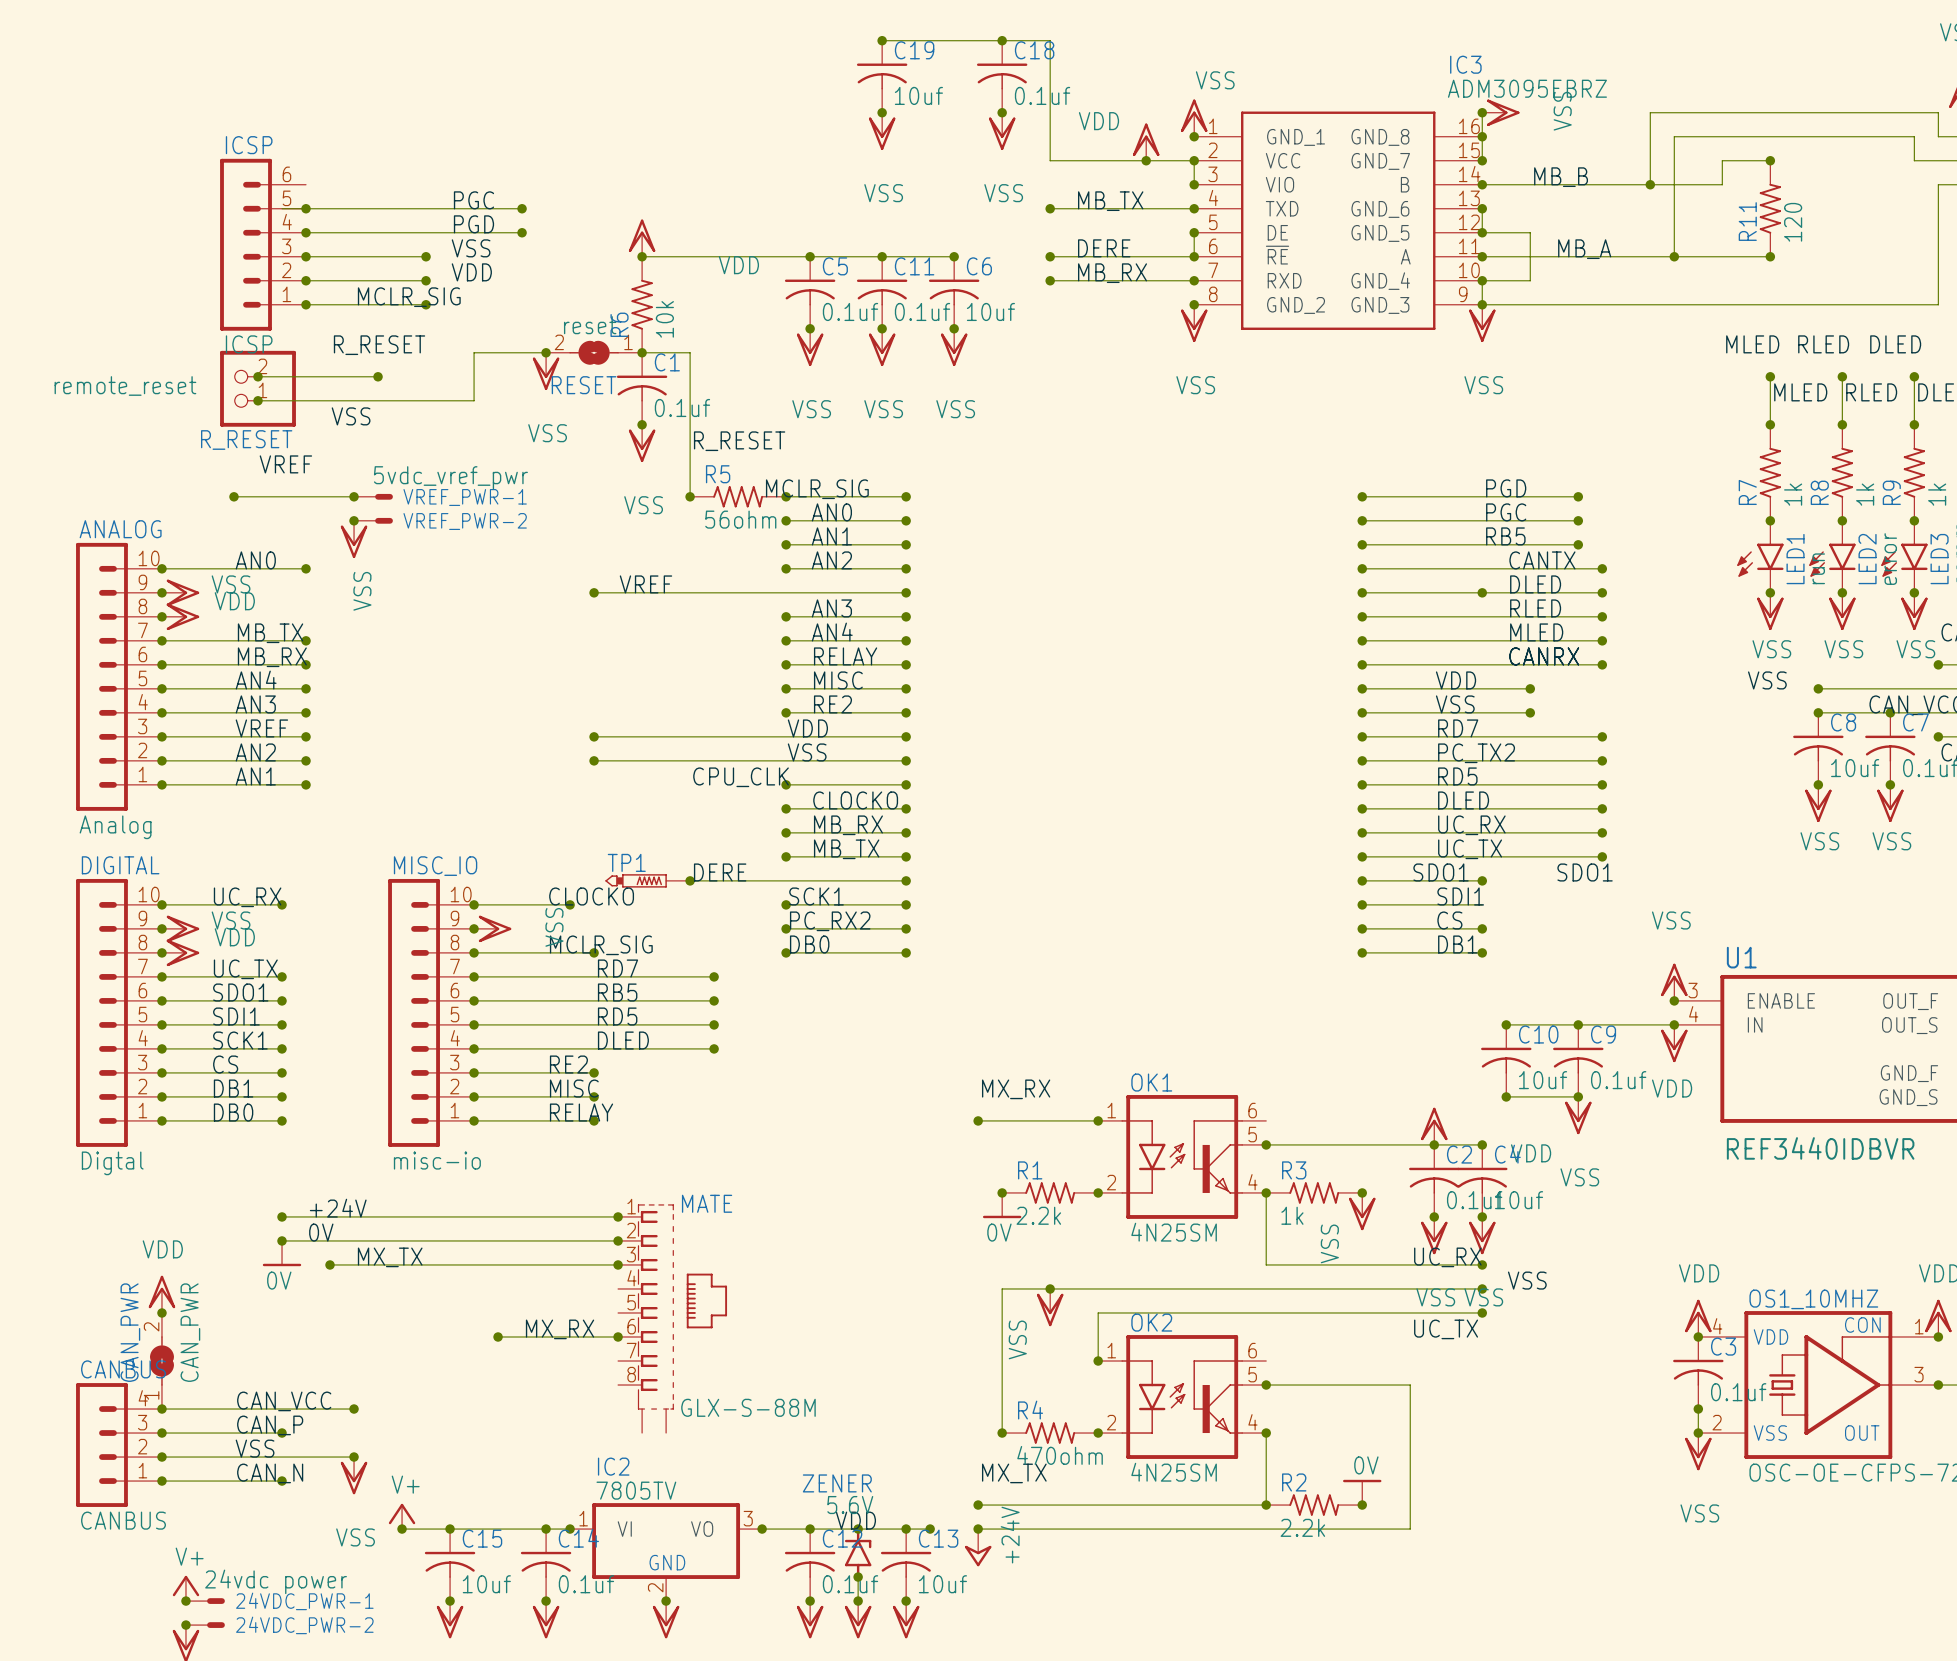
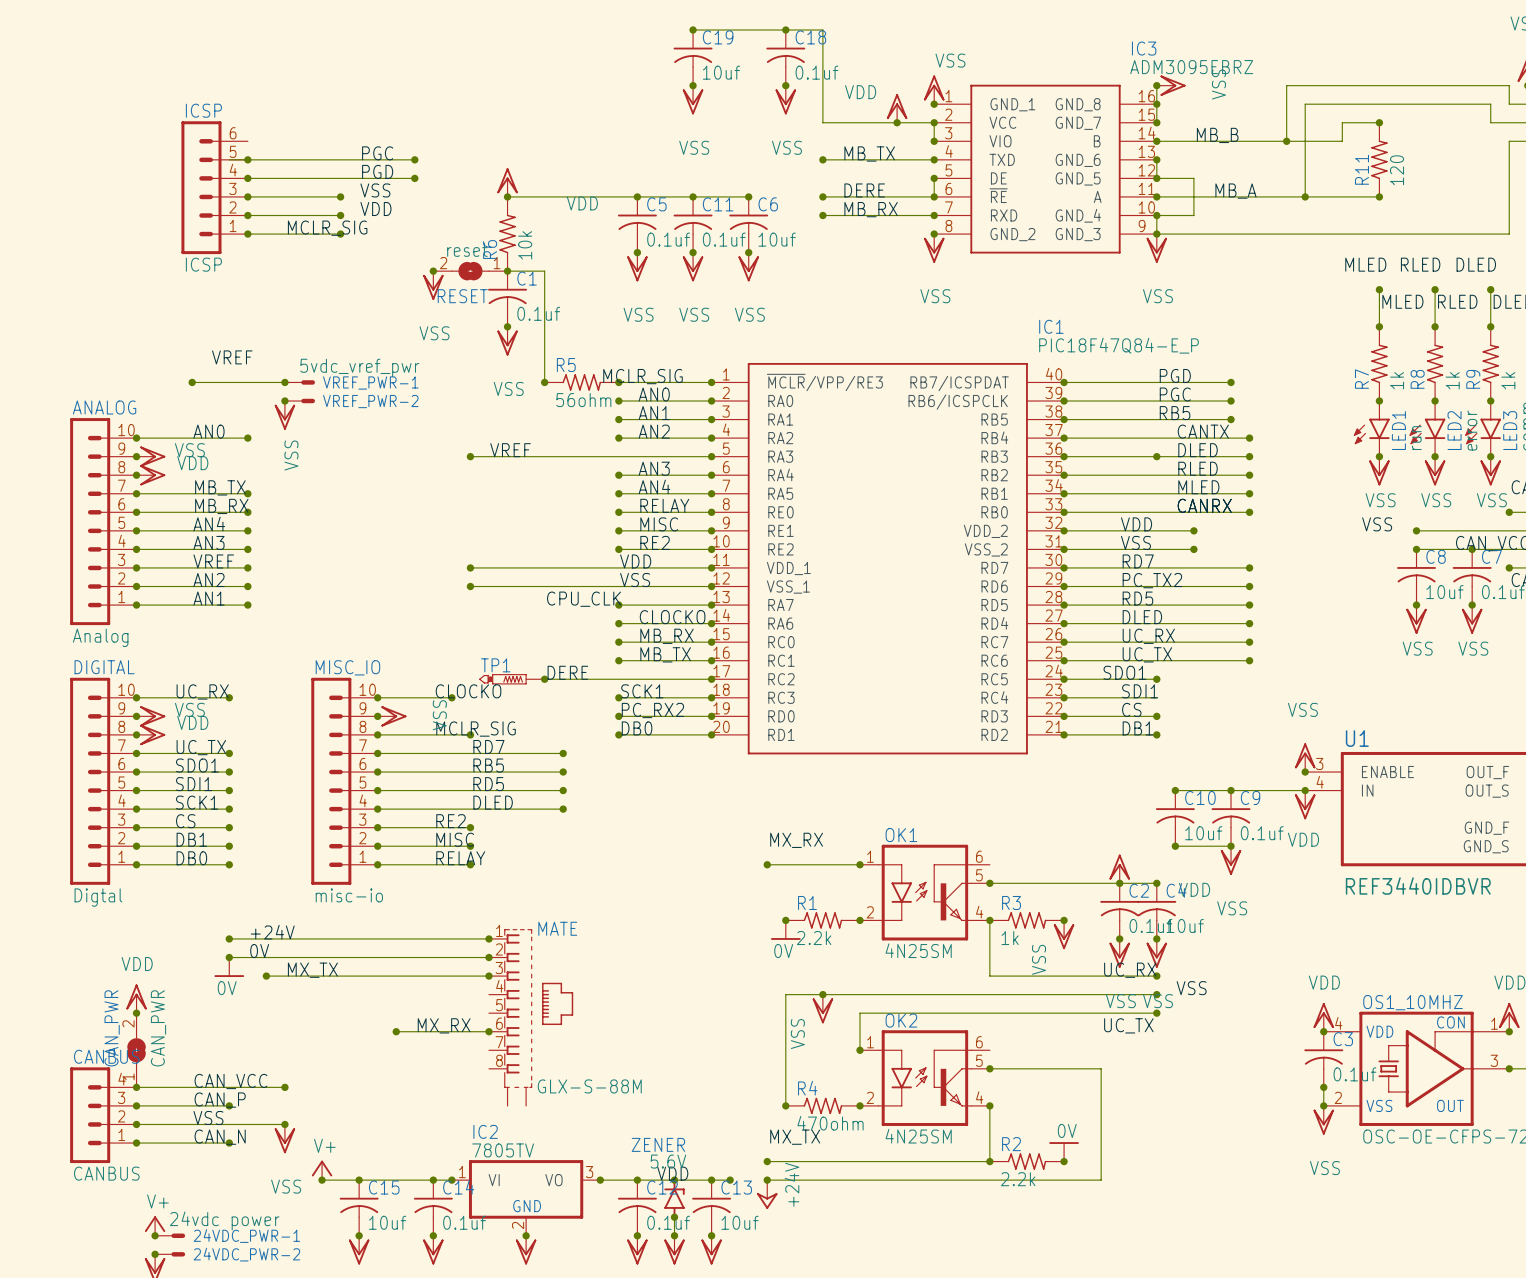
label: R_RESET (379, 345) -> none
wire: (546, 352) (474, 352) (474, 400) (258, 400) -> none
wire: (258, 376) (378, 376) -> none
junction: (258, 376) -> none
junction: (378, 376) -> none
R_RESET: remote_reset (258, 388) -> none
junction: (258, 400) -> none
label: VSS (351, 416) -> none
label: R_RESET (739, 441) -> none
IC1: none -> PIC18F47Q84-E_P (887, 558)
label: SDO1 (1585, 872) -> none

